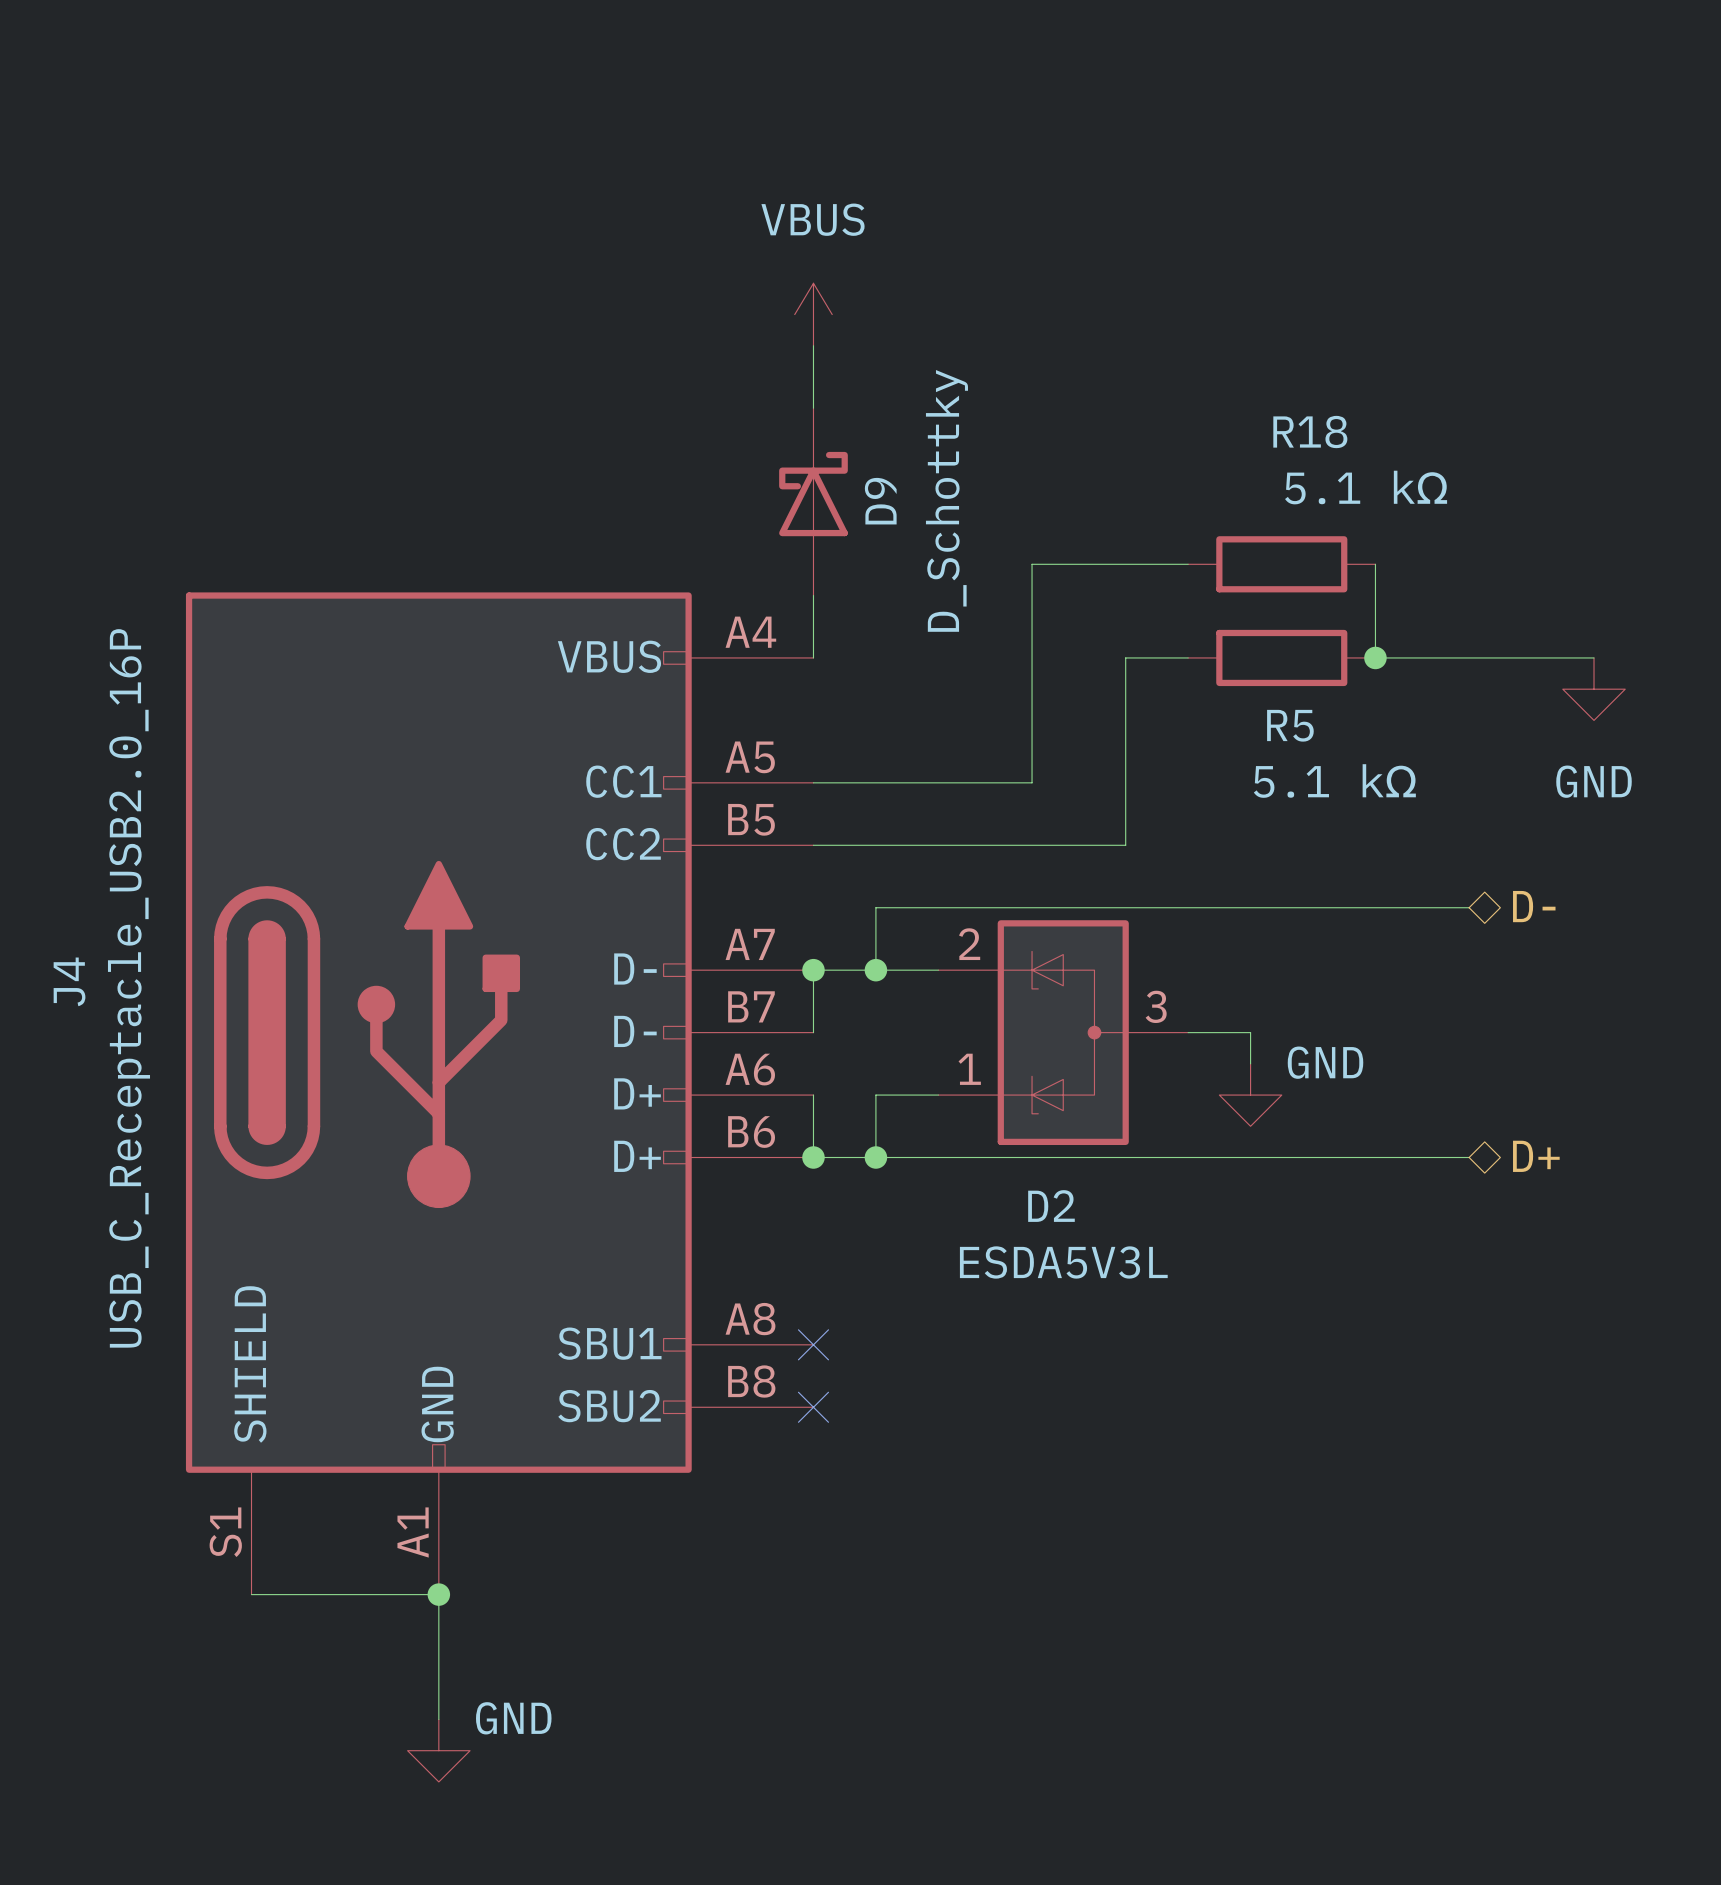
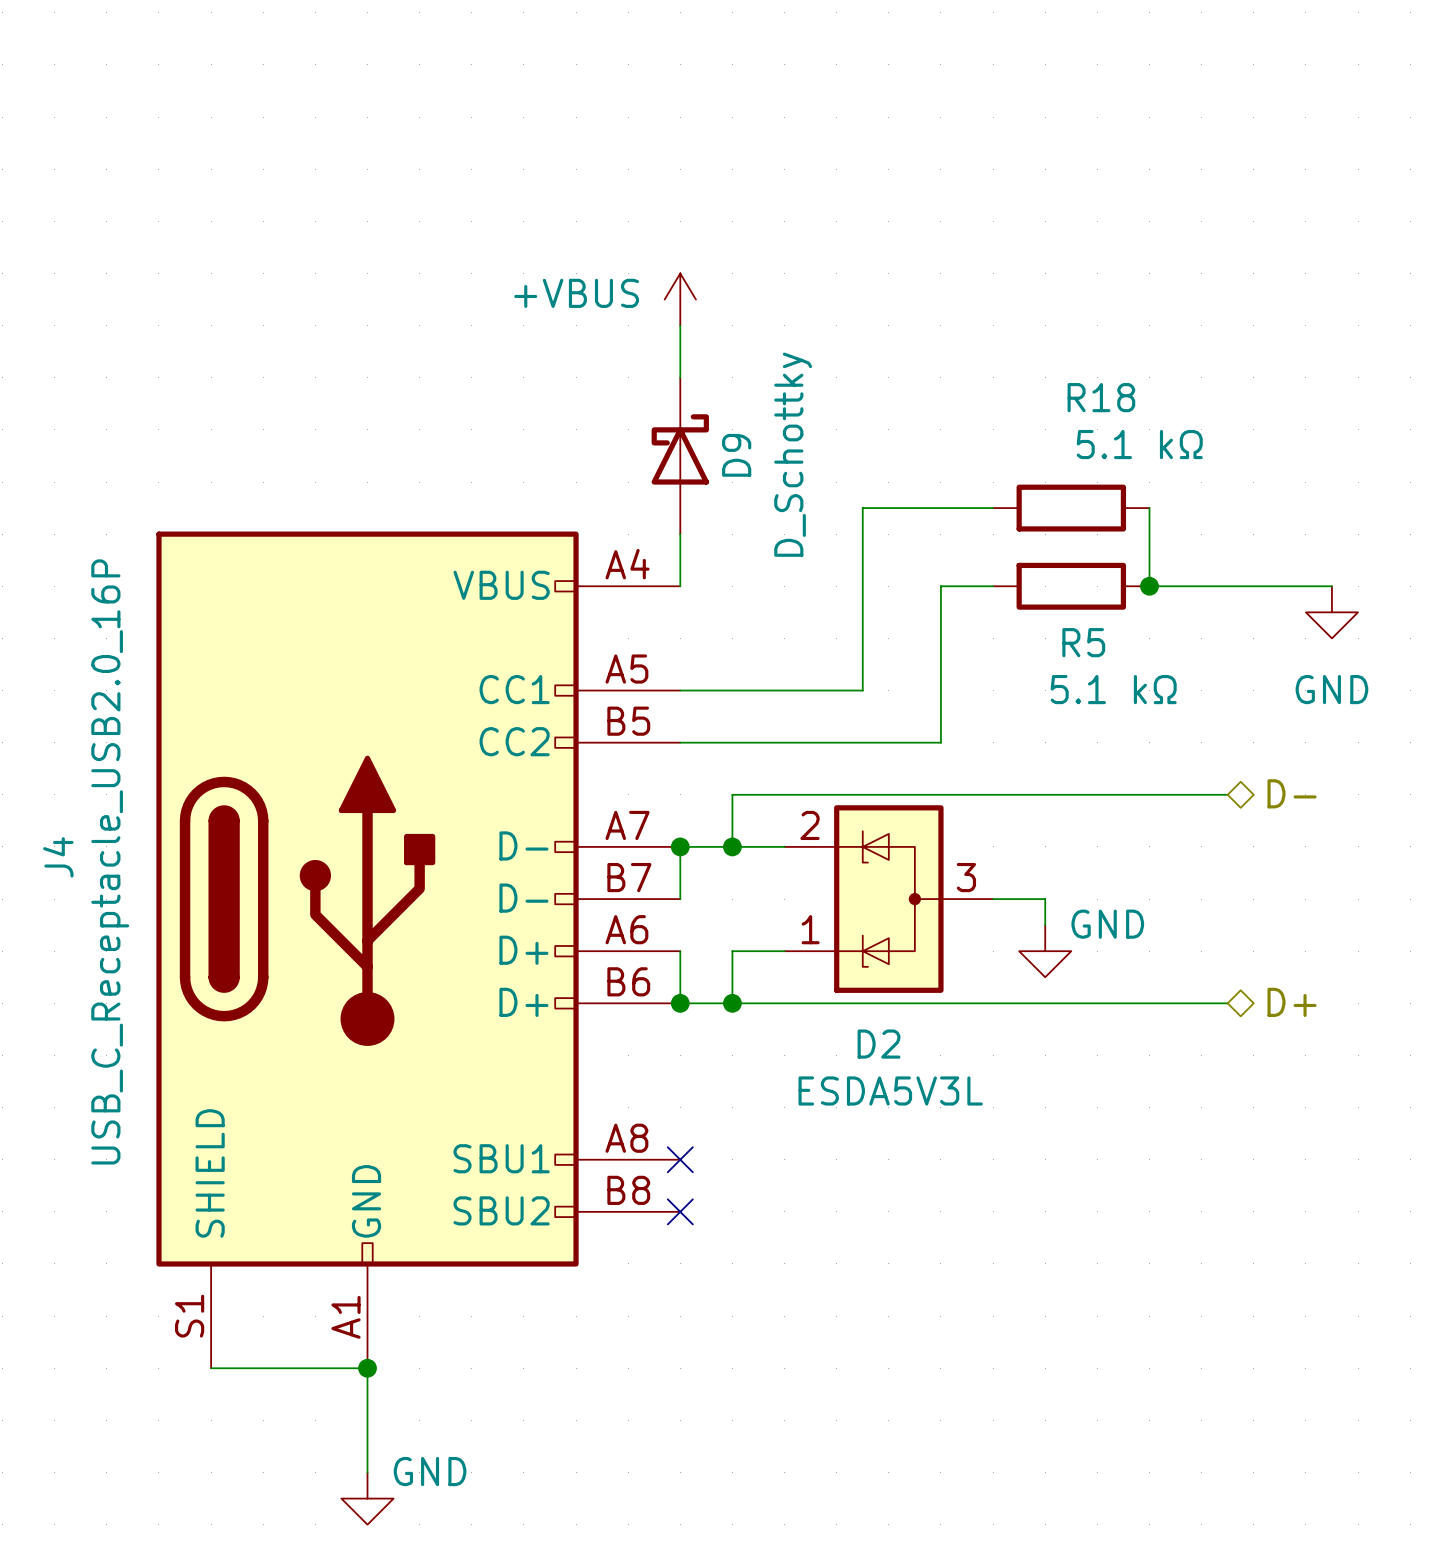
power symbol: VBUS (813, 314) -> +VBUS (680, 299)

